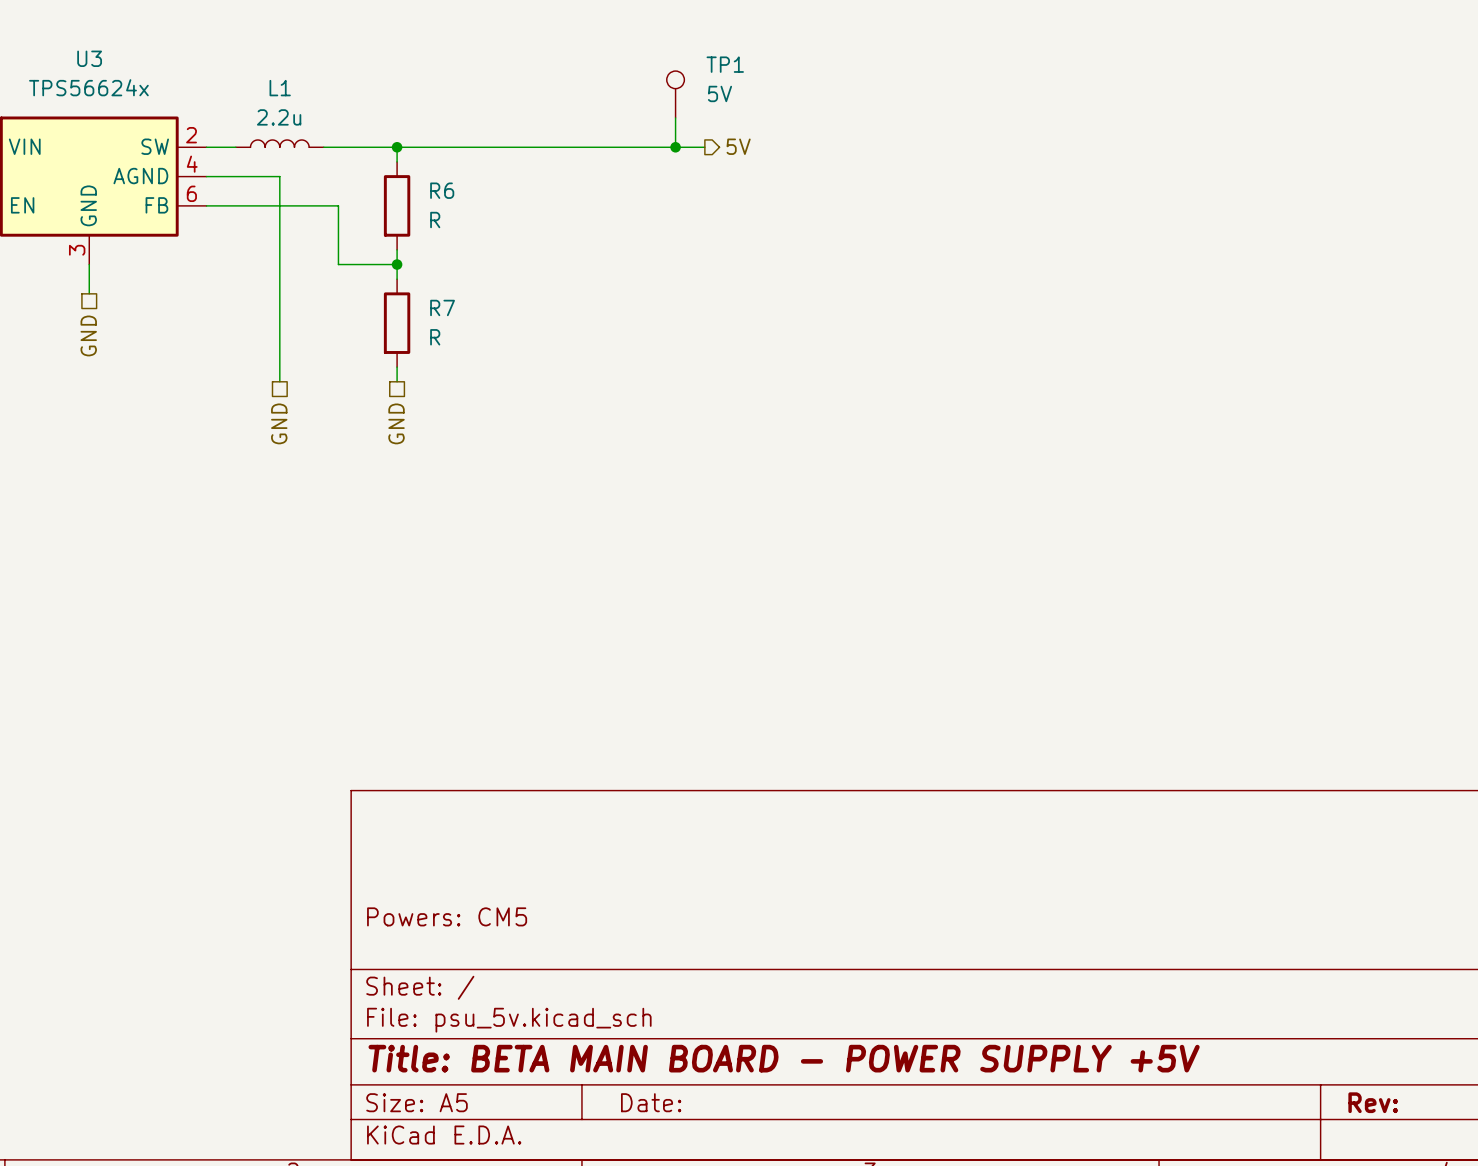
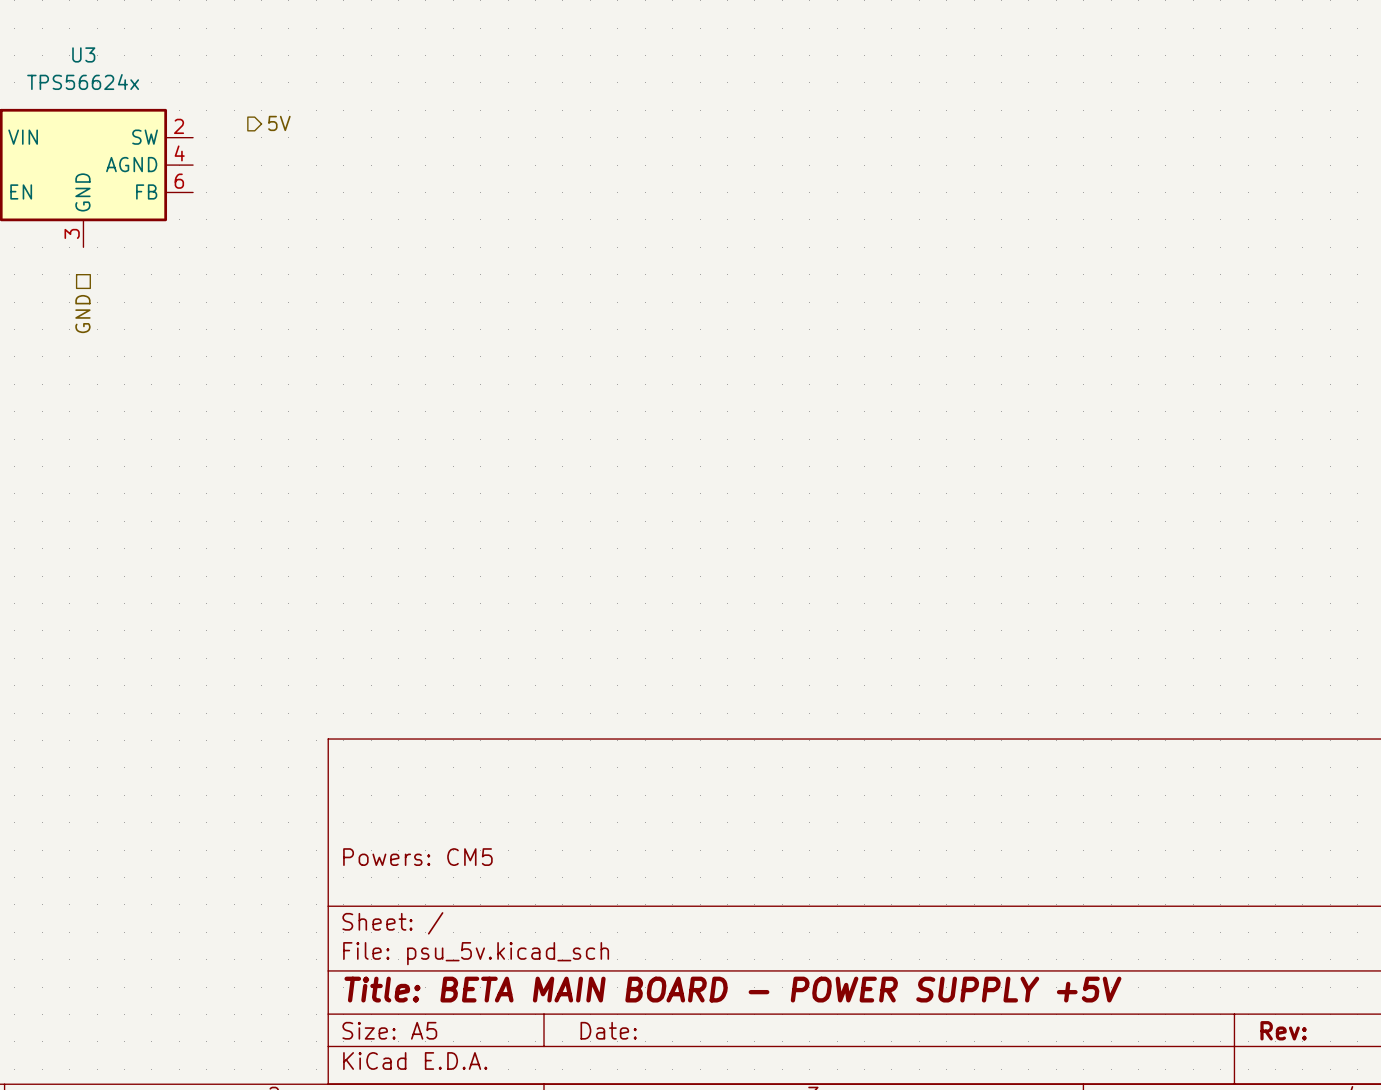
TP1: 5V (675, 94) -> none
wire: (675, 117) (675, 147) -> none
hierarchical label: none -> 5V (279, 123)
L1: 2.2u (279, 143) -> none
hierarchical label: 5V (738, 146) -> none
wire: (206, 147) (235, 147) -> none
wire: (323, 147) (704, 147) -> none
wire: (397, 147) (397, 161) -> none
junction: (397, 147) -> none
junction: (675, 147) -> none
wire: (206, 176) (279, 176) (279, 381) -> none
wire: (206, 205) (338, 205) (338, 264) (397, 264) -> none
R6: R (397, 205) -> none
wire: (397, 249) (397, 279) -> none
wire: (89, 264) (89, 293) -> none
junction: (397, 264) -> none
R7: R (397, 323) -> none
wire: (397, 367) (397, 381) -> none
hierarchical label: GND (279, 423) -> none
hierarchical label: GND (396, 423) -> none

